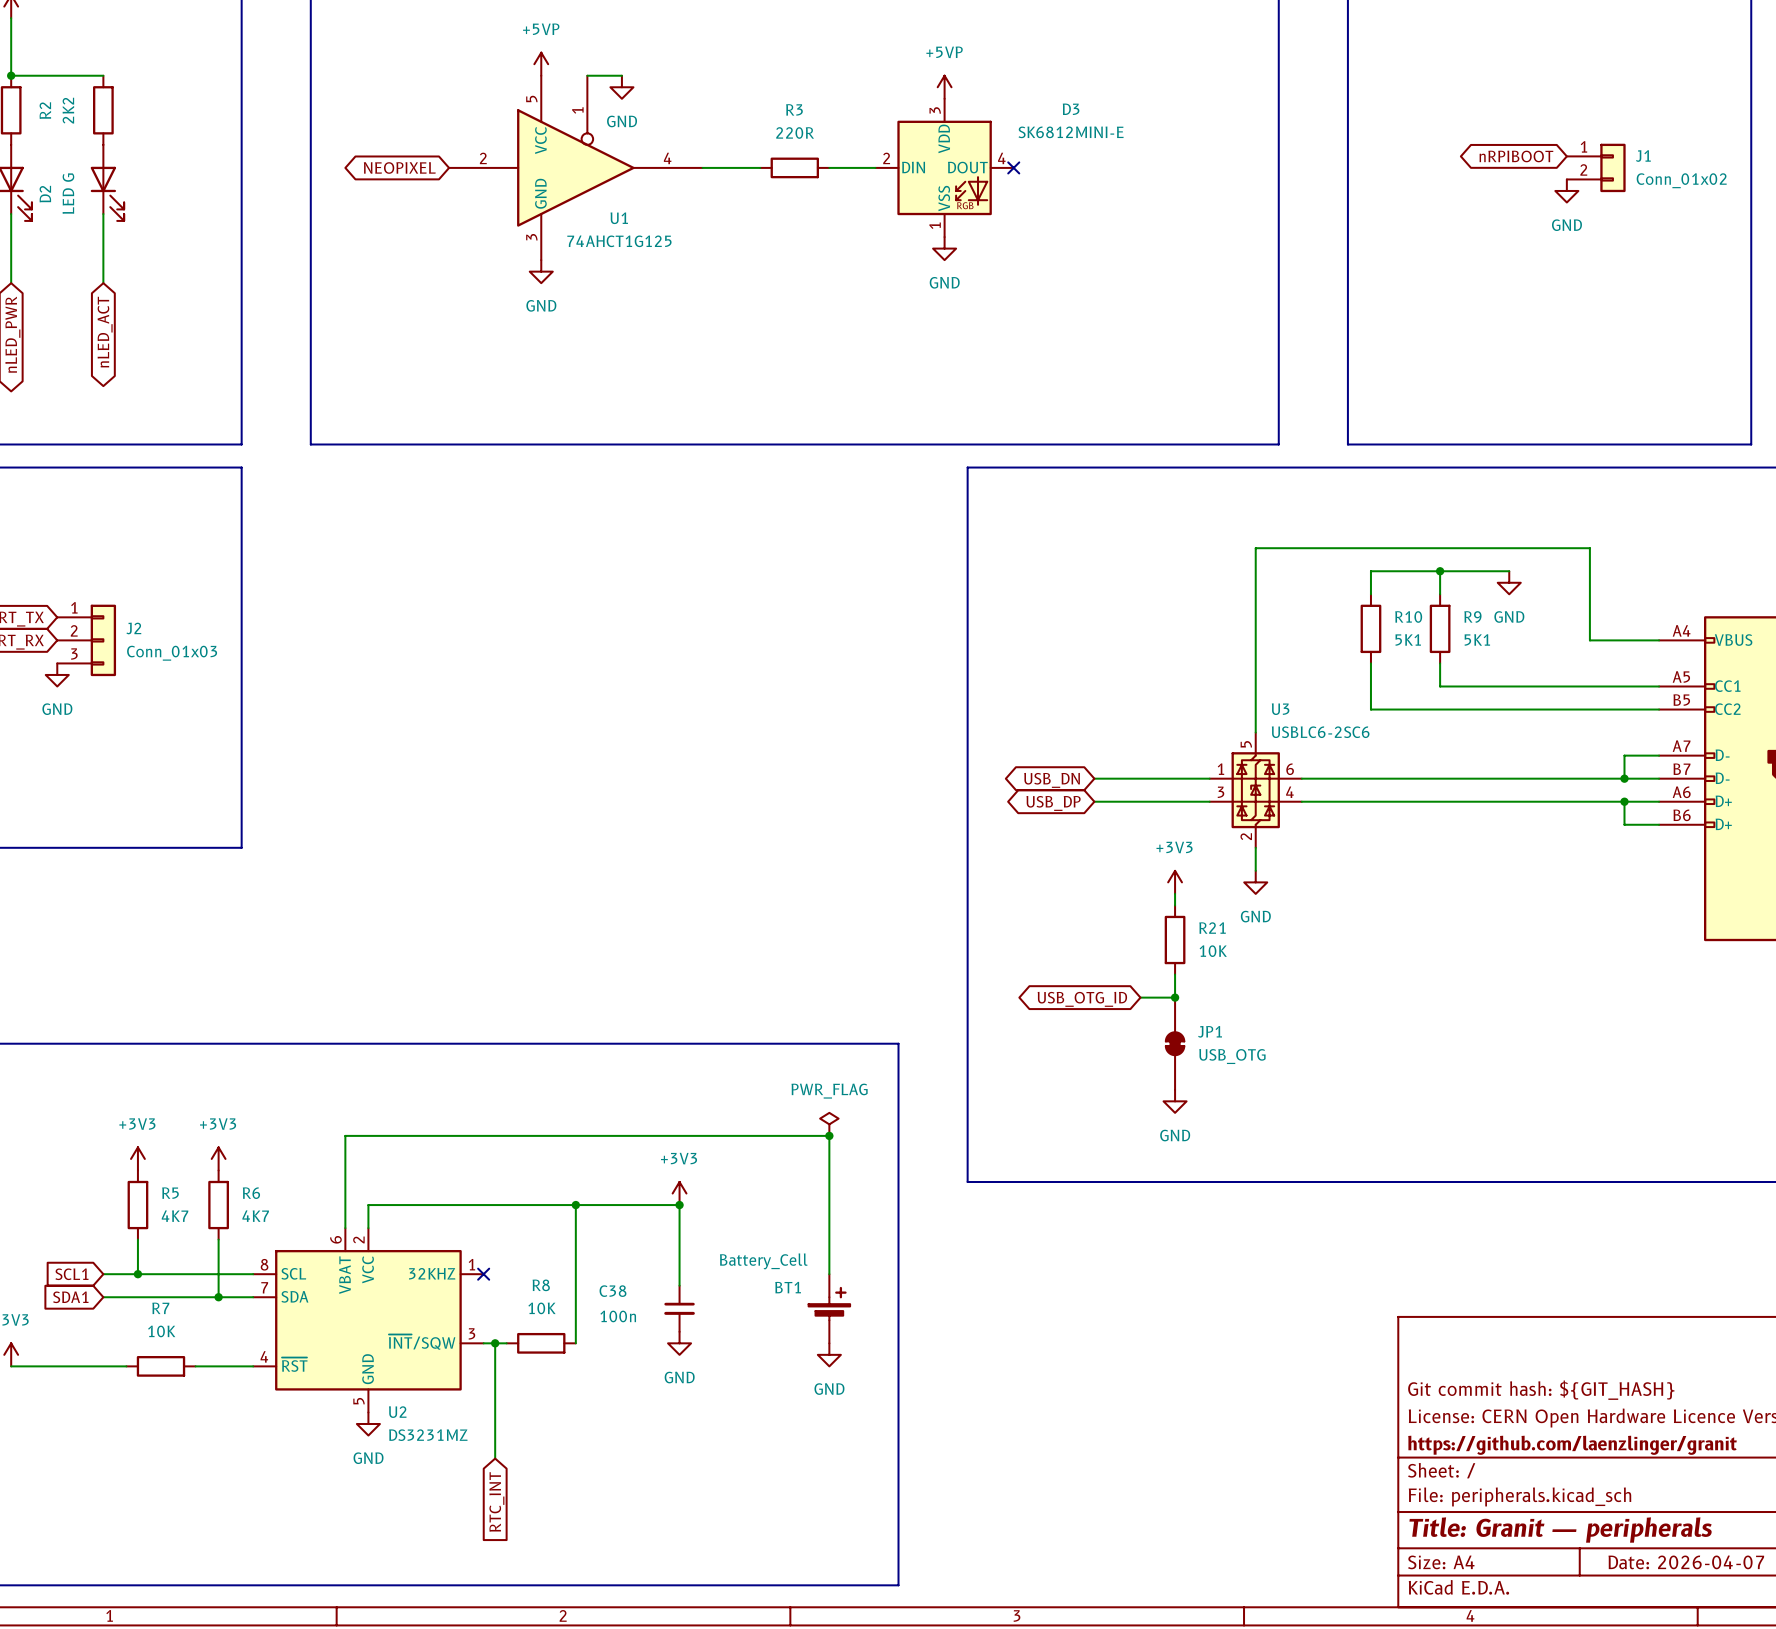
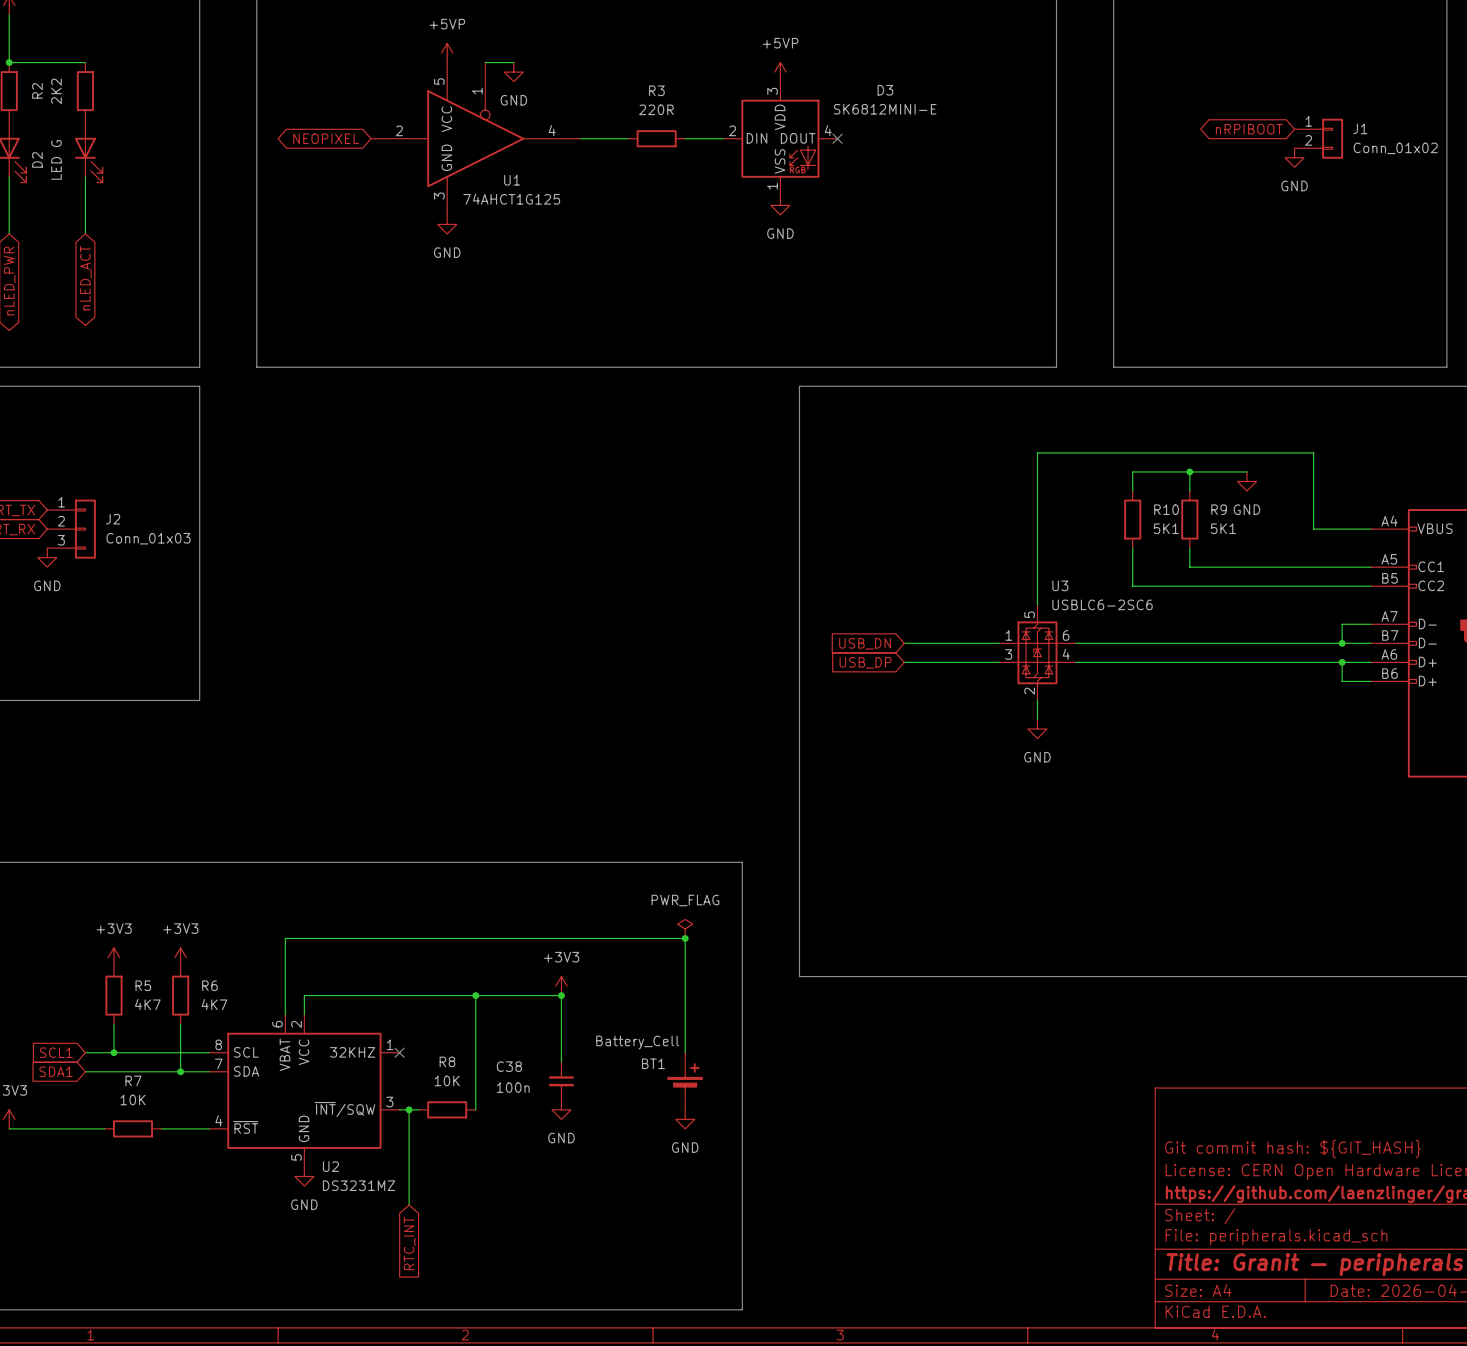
global label shape: bidirectional (1052, 780) -> input (865, 643)
global label shape: bidirectional (1053, 803) -> input (865, 662)
power symbol: +3V3 (1175, 882) -> none
wire: (1175, 893) (1175, 905) -> none
R21: 10K (1175, 940) -> none
wire: (1175, 974) (1175, 997) (1140, 997) -> none
junction: (1175, 997) -> none
global label: USB_OTG_ID (1082, 999) -> none
JP1: USB_OTG (1175, 1043) -> none
power symbol: GND (1175, 1101) -> none

